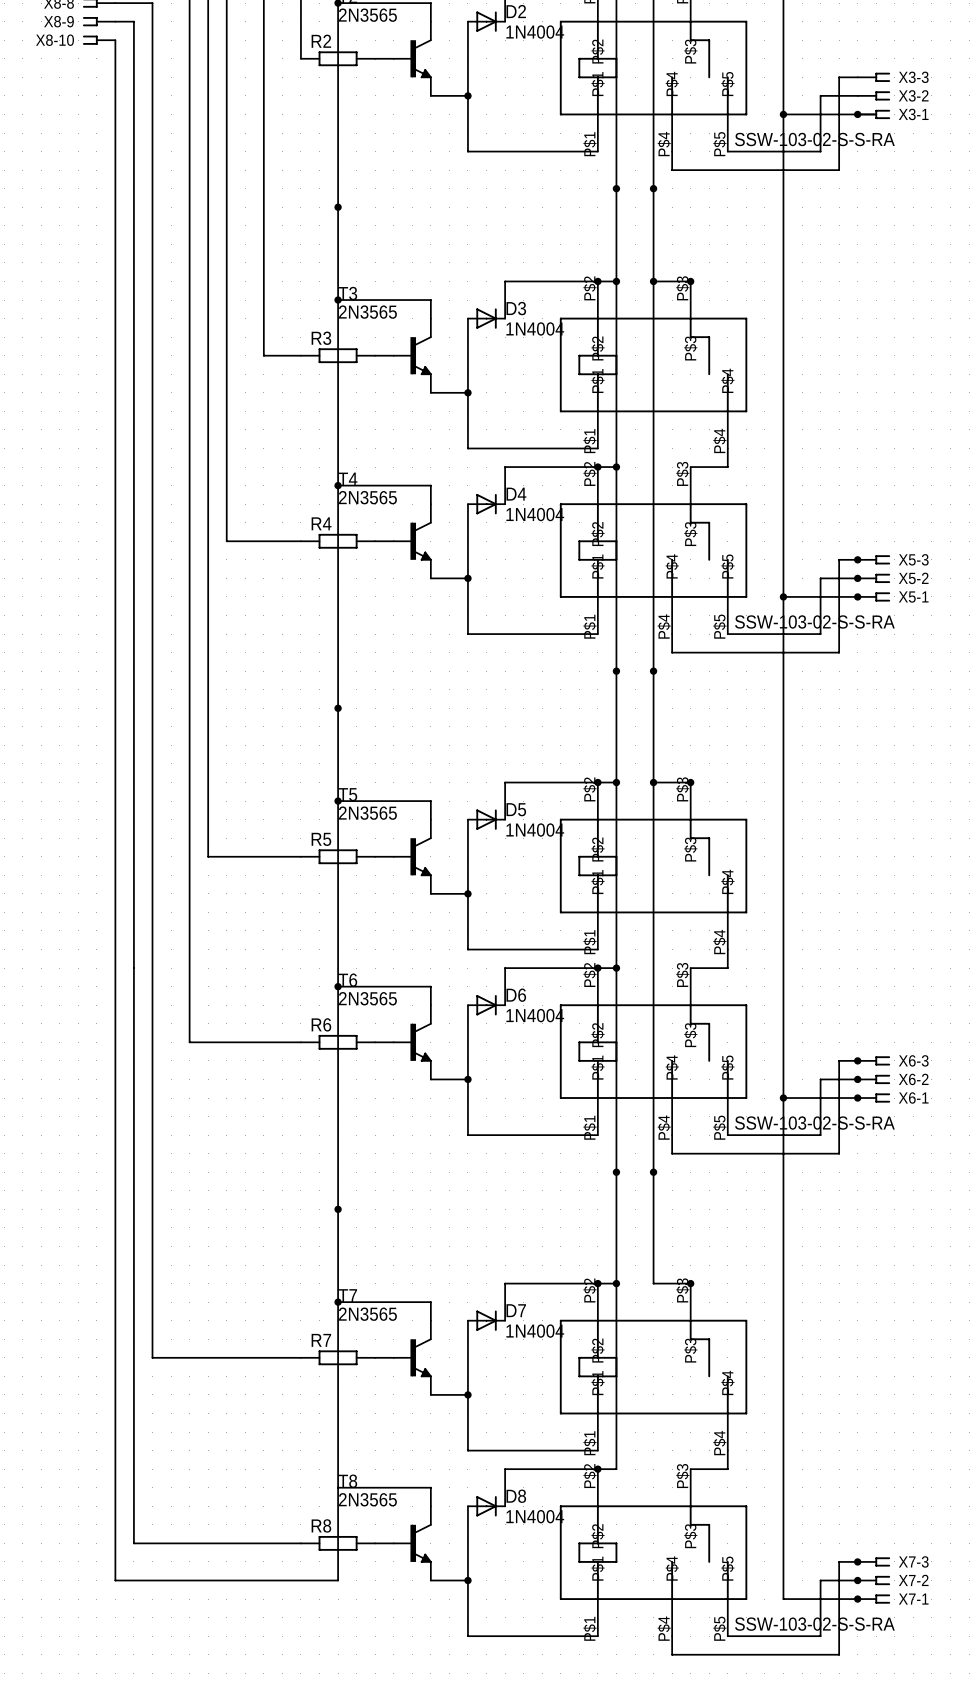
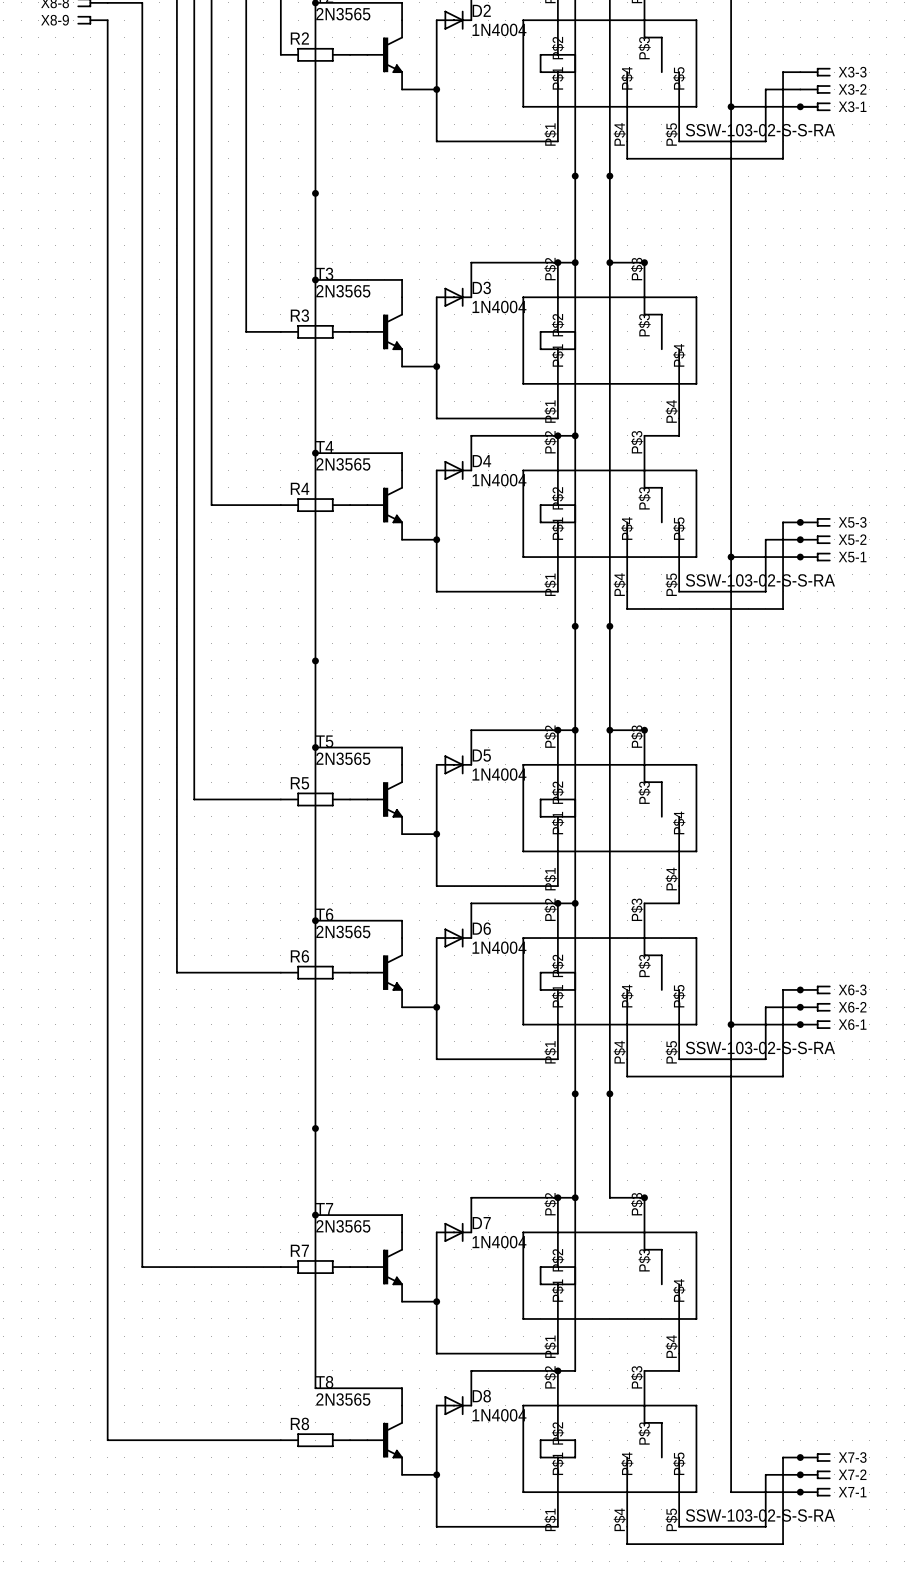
wire: (115, 21) (133, 21) (133, 1543) -> (107, 20) (107, 37)
X8-10: (99, 40) -> none
wire: (338, 1487) (338, 1580) (115, 1580) (115, 1543) -> (124, 1440) (107, 1440)

